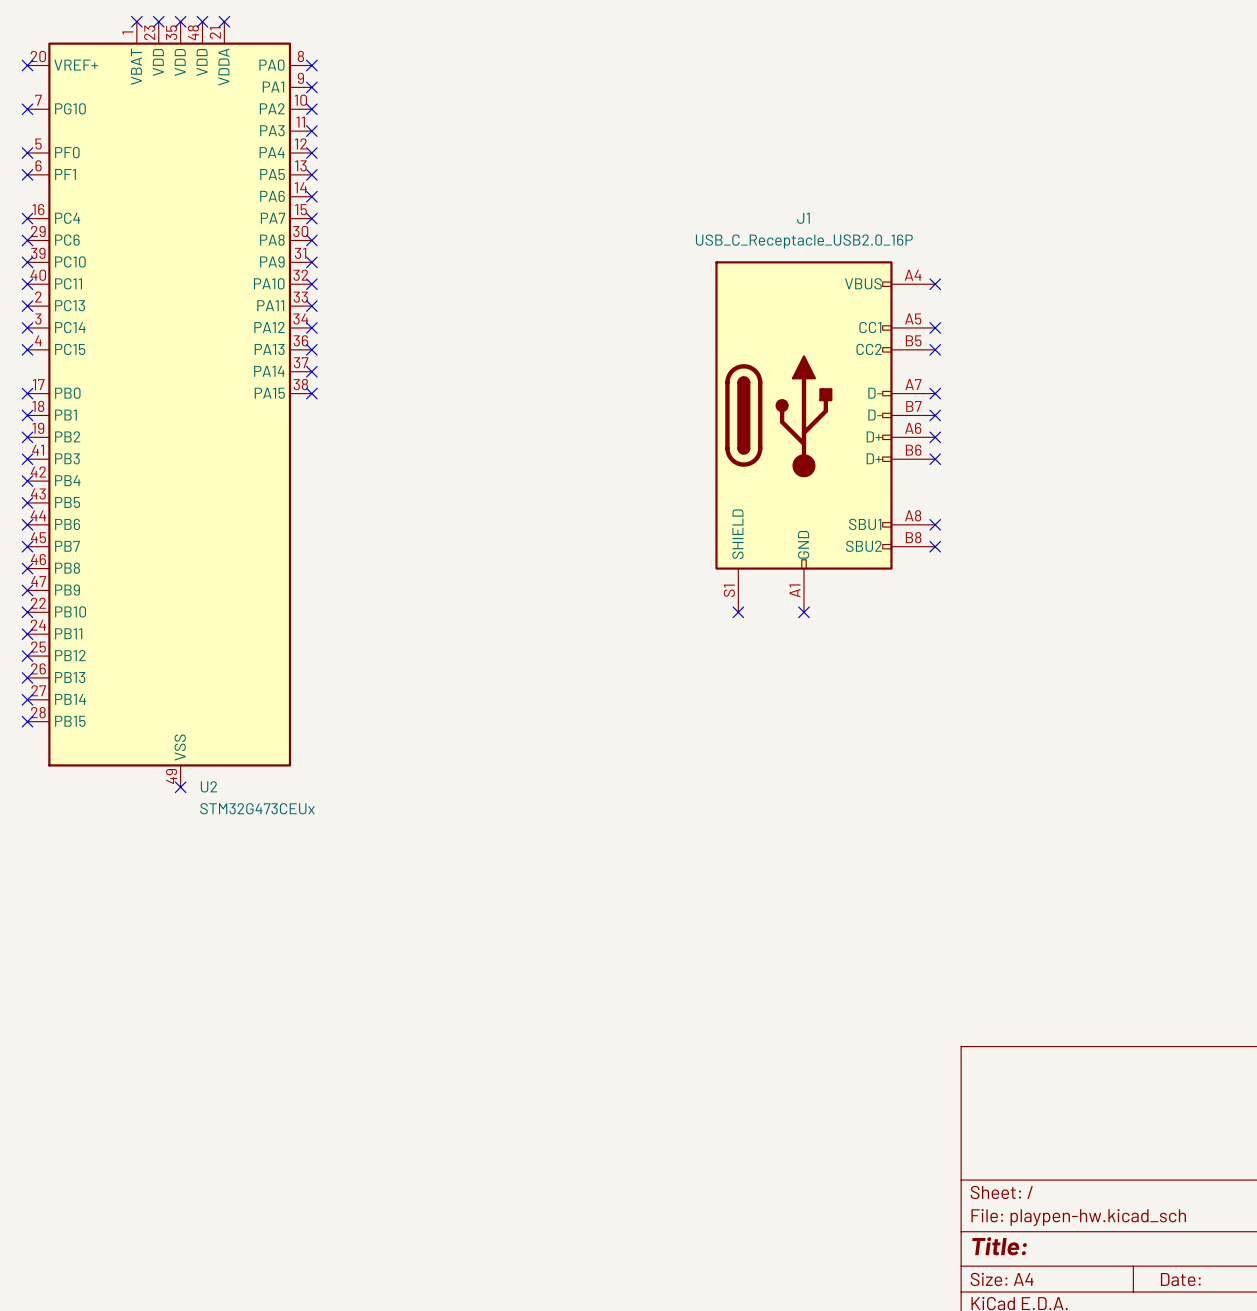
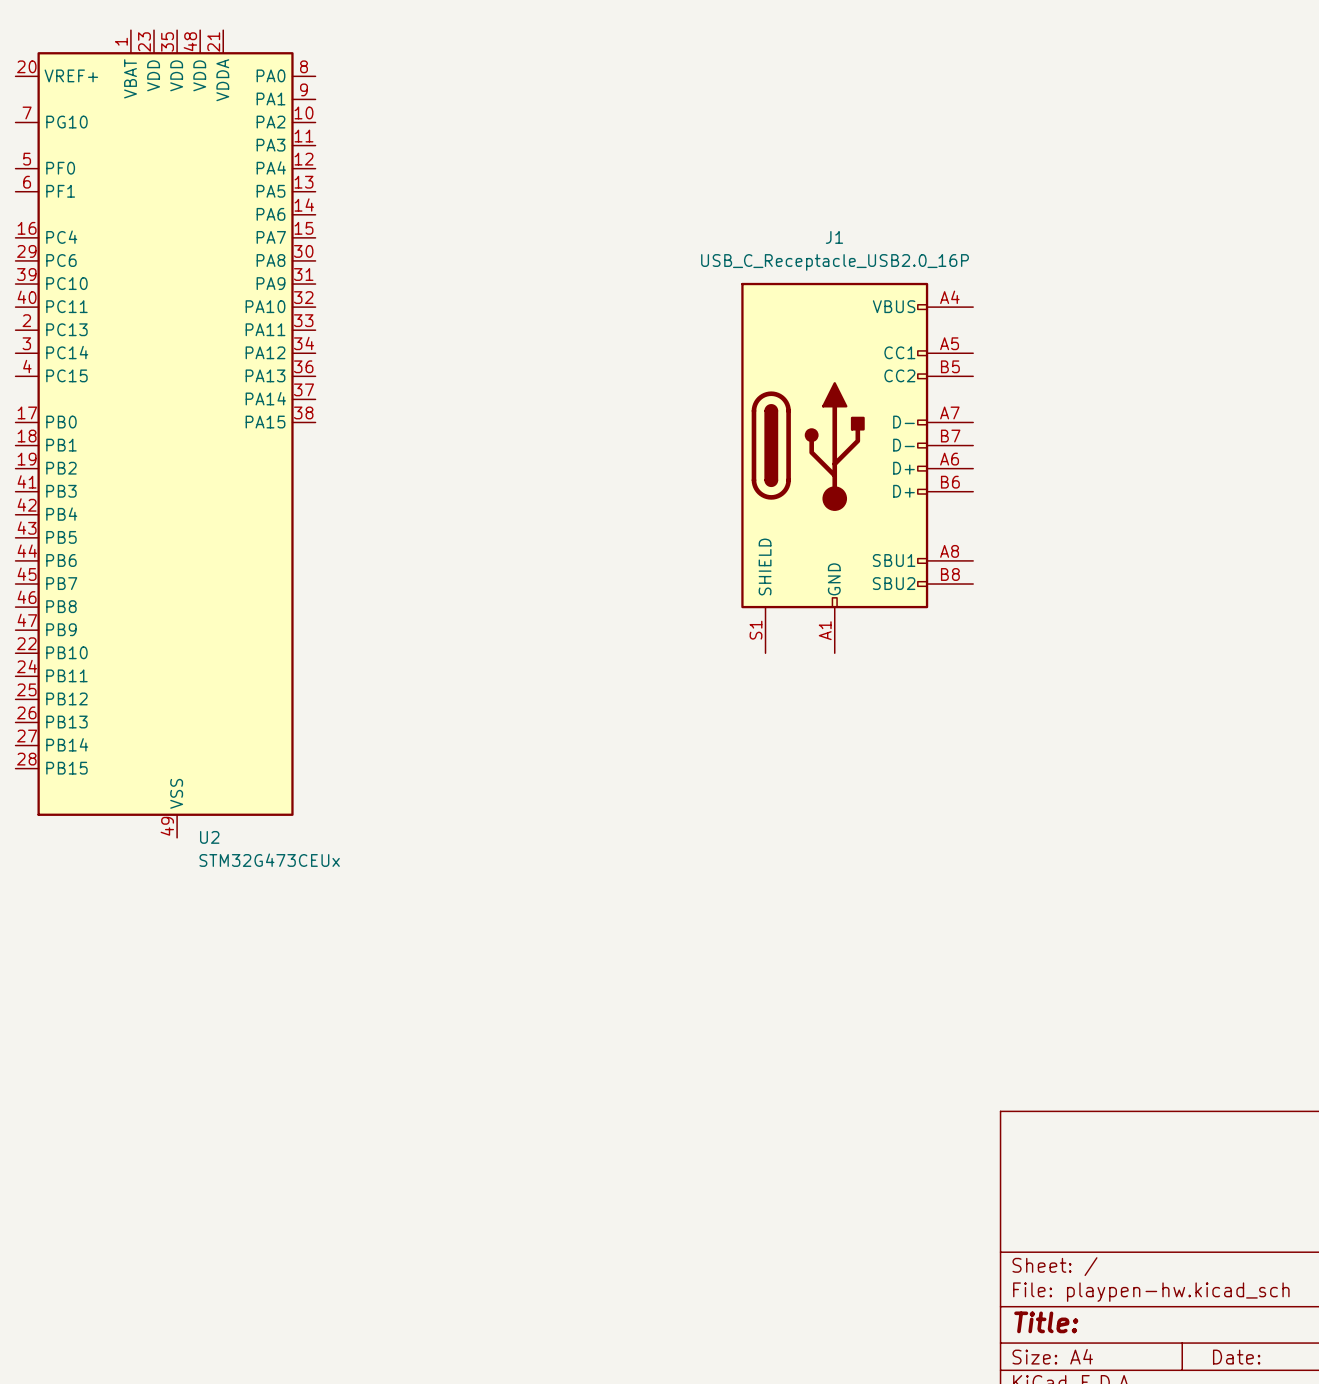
no-connect mark: (136, 21) -> none
no-connect mark: (158, 21) -> none
no-connect mark: (180, 21) -> none
no-connect mark: (202, 21) -> none
no-connect mark: (224, 21) -> none
no-connect mark: (27, 65) -> none
no-connect mark: (311, 65) -> none
no-connect mark: (311, 87) -> none
no-connect mark: (27, 109) -> none
no-connect mark: (311, 109) -> none
no-connect mark: (311, 131) -> none
no-connect mark: (27, 152) -> none
no-connect mark: (311, 152) -> none
no-connect mark: (27, 174) -> none
no-connect mark: (311, 174) -> none
no-connect mark: (311, 196) -> none
no-connect mark: (27, 218) -> none
no-connect mark: (311, 218) -> none
no-connect mark: (27, 240) -> none
no-connect mark: (311, 240) -> none
no-connect mark: (27, 262) -> none
no-connect mark: (311, 262) -> none
no-connect mark: (27, 284) -> none
no-connect mark: (311, 284) -> none
no-connect mark: (935, 284) -> none
no-connect mark: (27, 306) -> none
no-connect mark: (311, 306) -> none
no-connect mark: (27, 327) -> none
no-connect mark: (311, 327) -> none
no-connect mark: (935, 327) -> none
no-connect mark: (27, 349) -> none
no-connect mark: (311, 349) -> none
no-connect mark: (935, 349) -> none
no-connect mark: (311, 371) -> none
no-connect mark: (27, 393) -> none
no-connect mark: (311, 393) -> none
no-connect mark: (935, 393) -> none
no-connect mark: (27, 415) -> none
no-connect mark: (935, 415) -> none
no-connect mark: (27, 437) -> none
no-connect mark: (935, 437) -> none
no-connect mark: (27, 459) -> none
no-connect mark: (935, 459) -> none
no-connect mark: (27, 481) -> none
no-connect mark: (27, 502) -> none
no-connect mark: (27, 524) -> none
no-connect mark: (935, 524) -> none
no-connect mark: (27, 546) -> none
no-connect mark: (935, 546) -> none
no-connect mark: (27, 568) -> none
no-connect mark: (27, 590) -> none
no-connect mark: (27, 612) -> none
no-connect mark: (738, 612) -> none
no-connect mark: (803, 612) -> none
no-connect mark: (27, 634) -> none
no-connect mark: (27, 656) -> none
no-connect mark: (27, 677) -> none
no-connect mark: (27, 699) -> none
no-connect mark: (27, 721) -> none
no-connect mark: (180, 787) -> none

